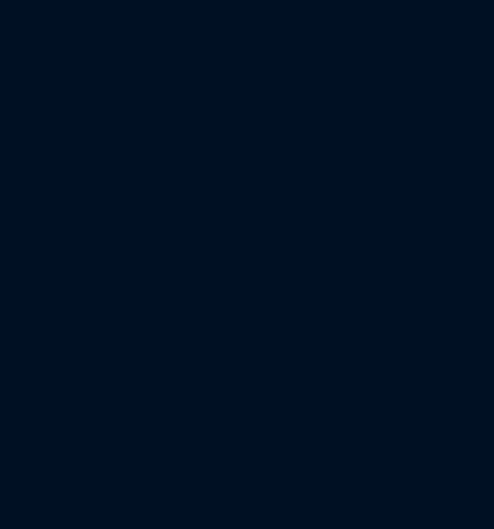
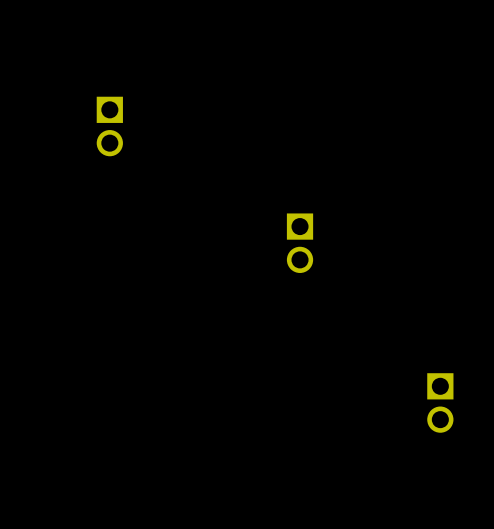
part: none -> (109, 126)
part: none -> (300, 243)
part: none -> (440, 402)

